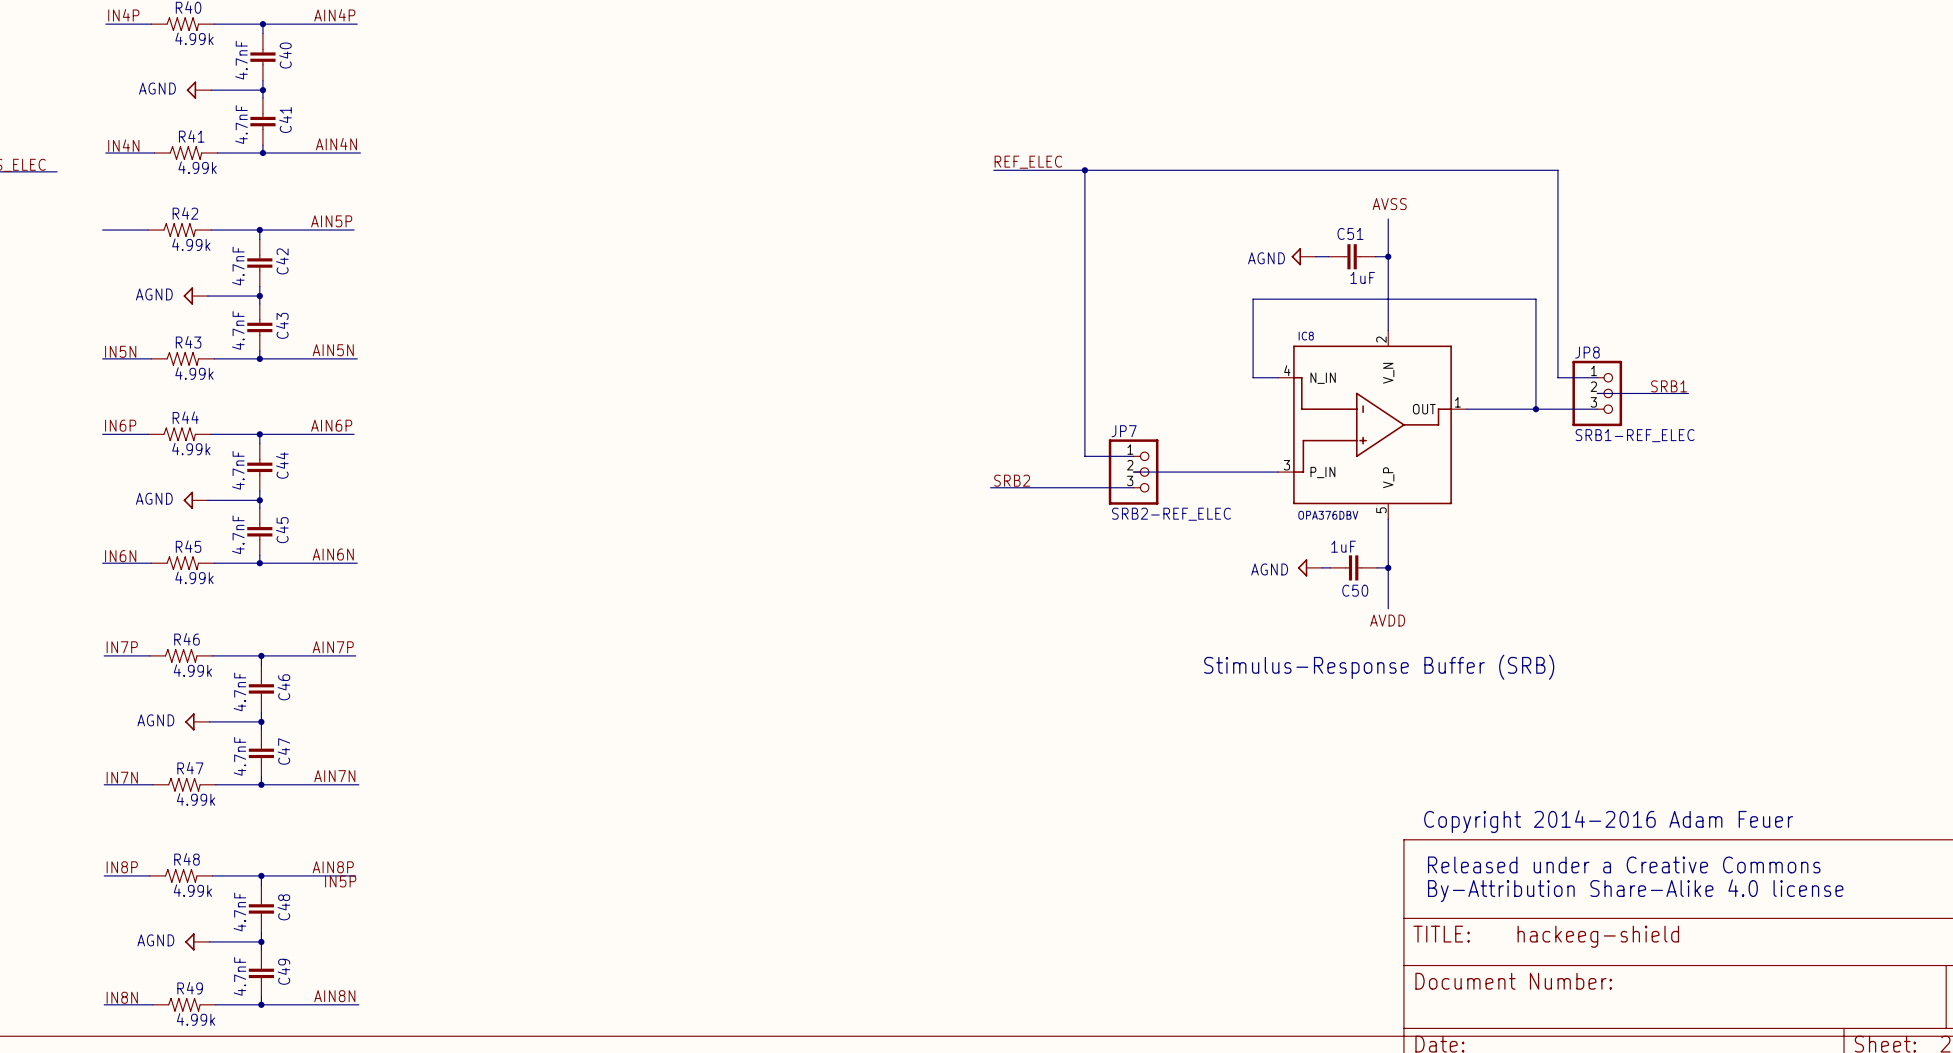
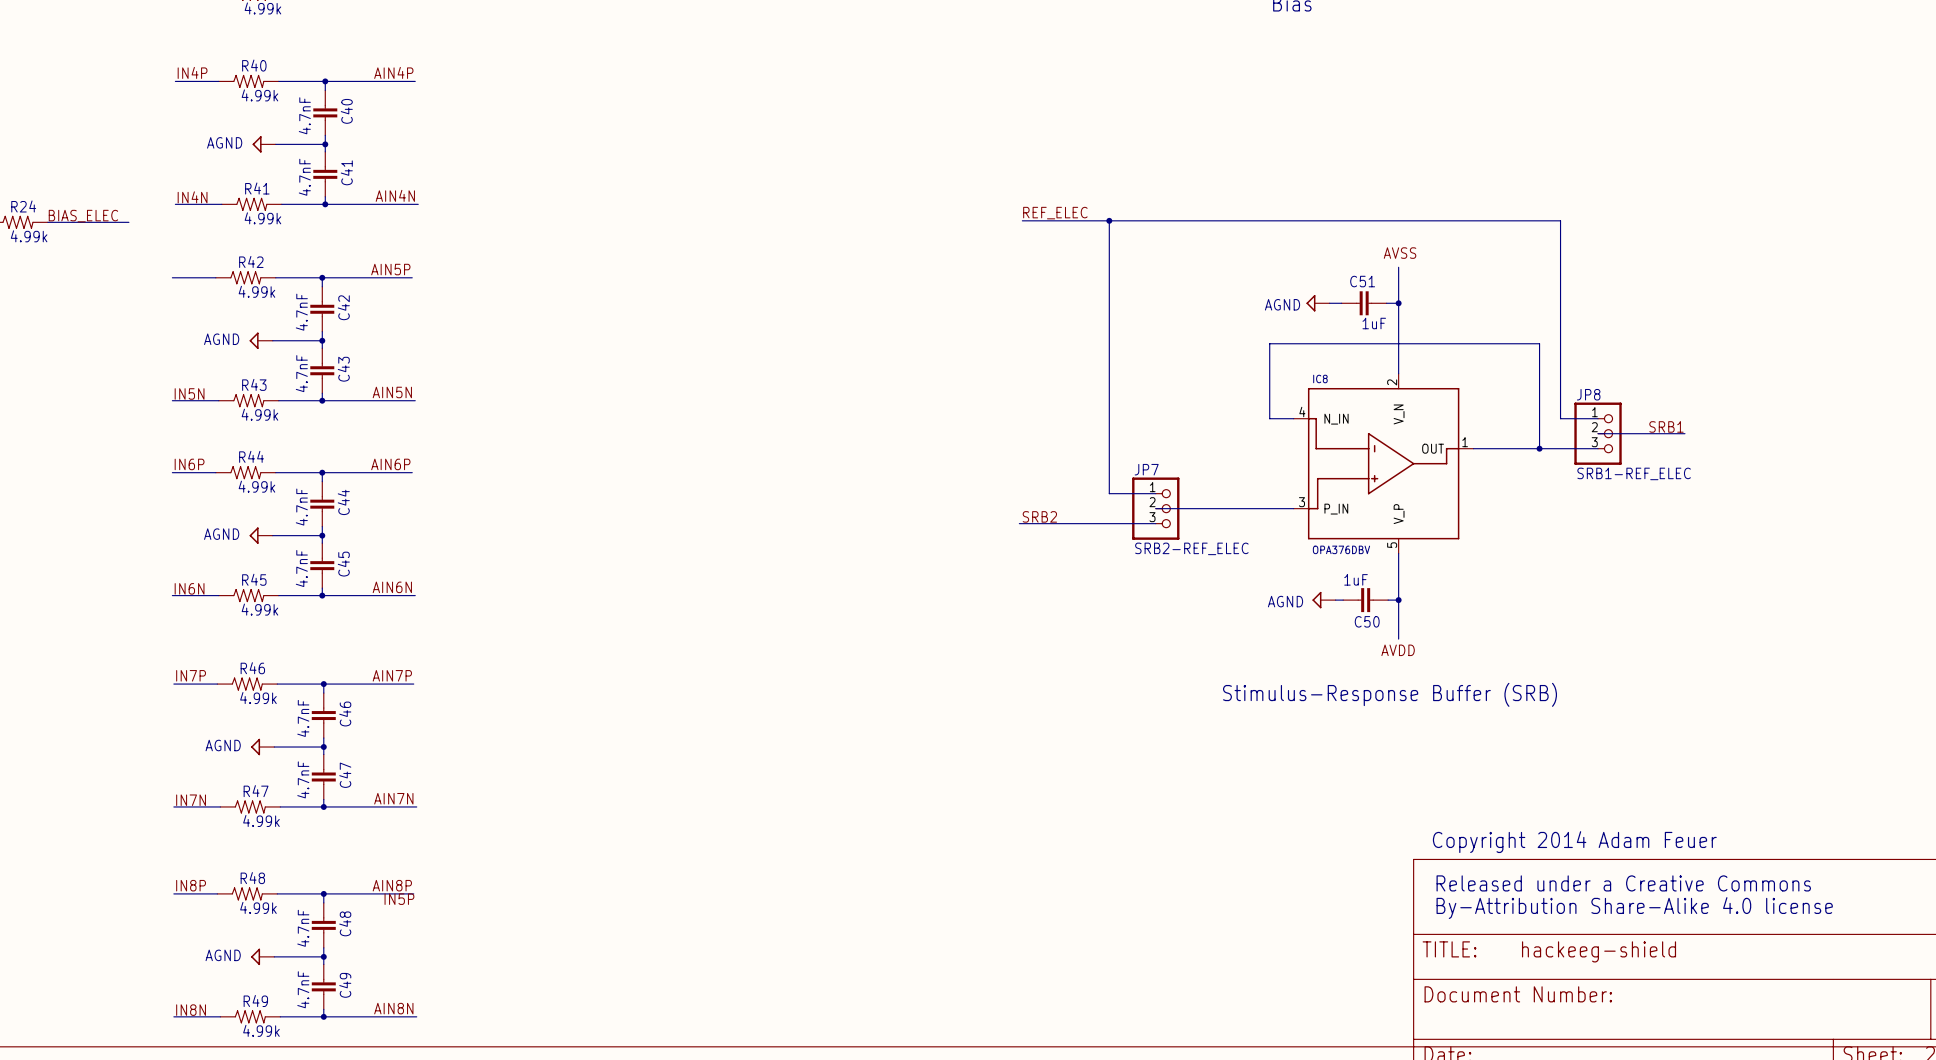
text: Copyright 2014-2016 Adam Feuer (1608, 821) -> Copyright 2014 Adam Feuer (1574, 842)

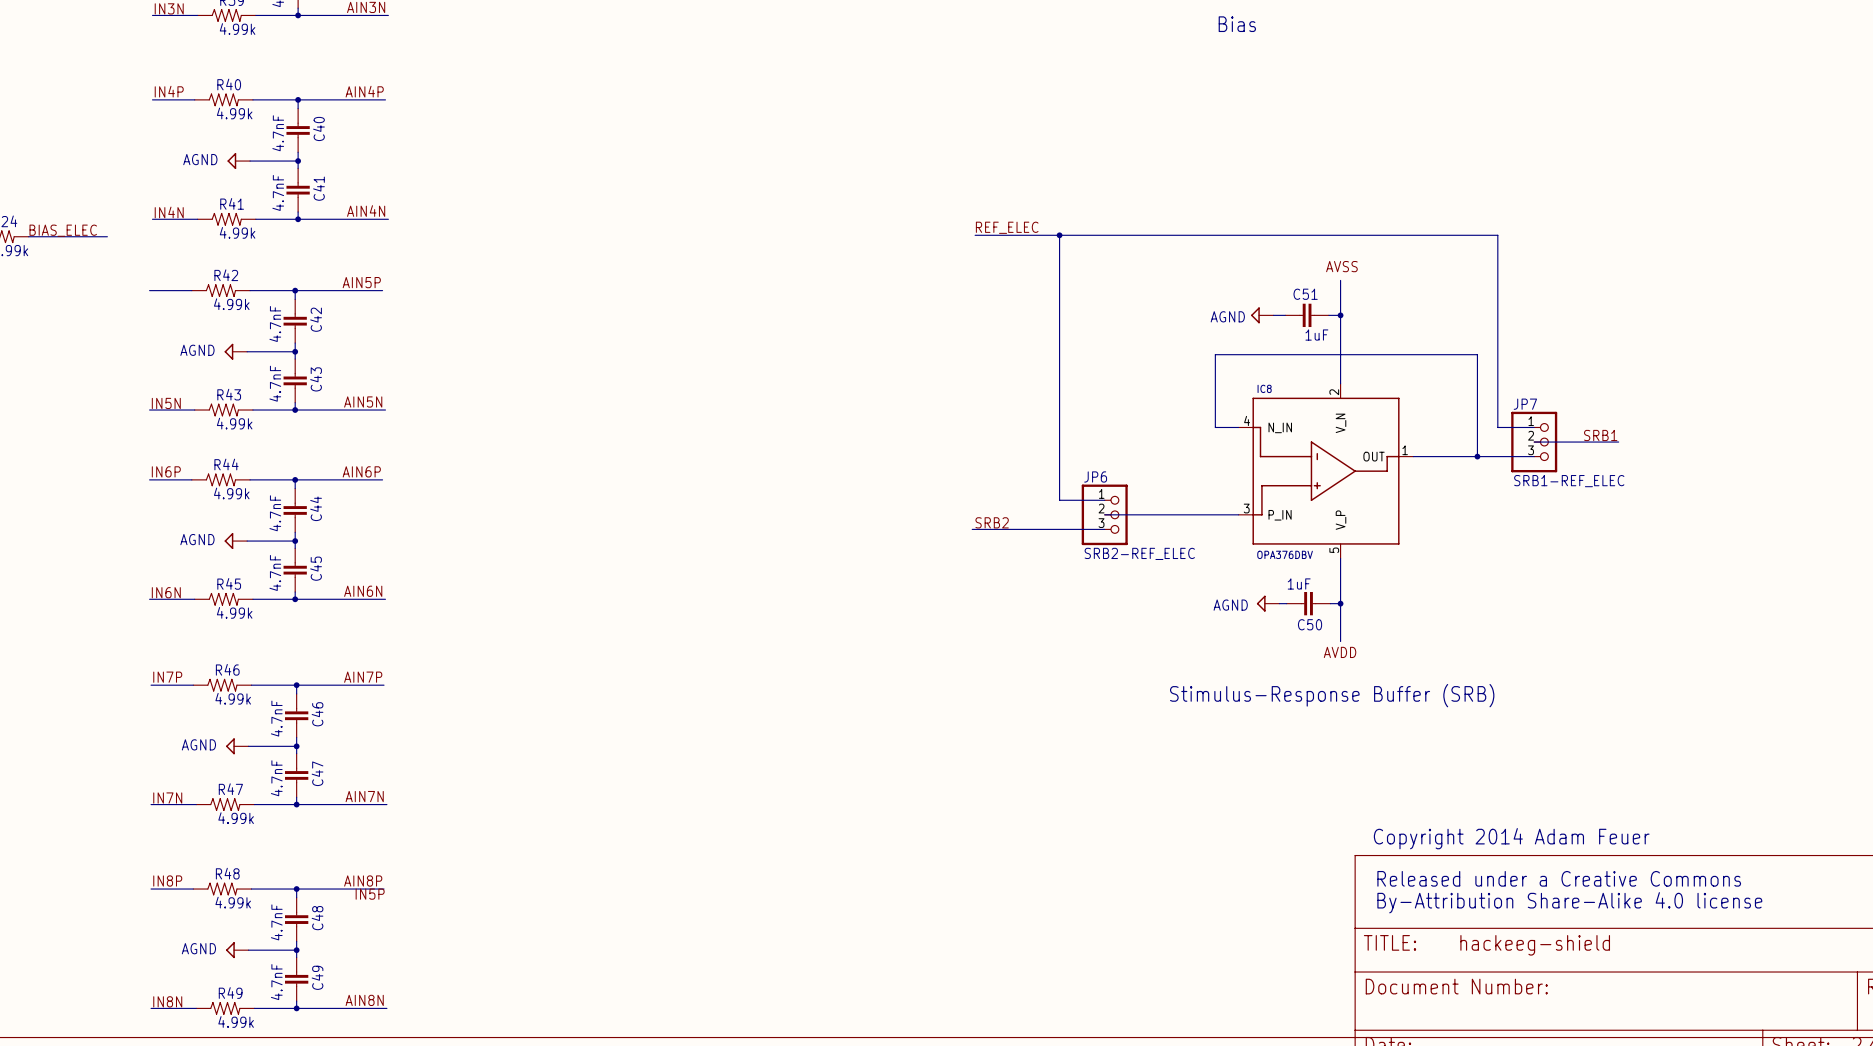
JP8 name: JP8 (1588, 394) -> JP7 (1525, 404)
JP7 name: JP7 (1146, 469) -> JP6 (1095, 476)

